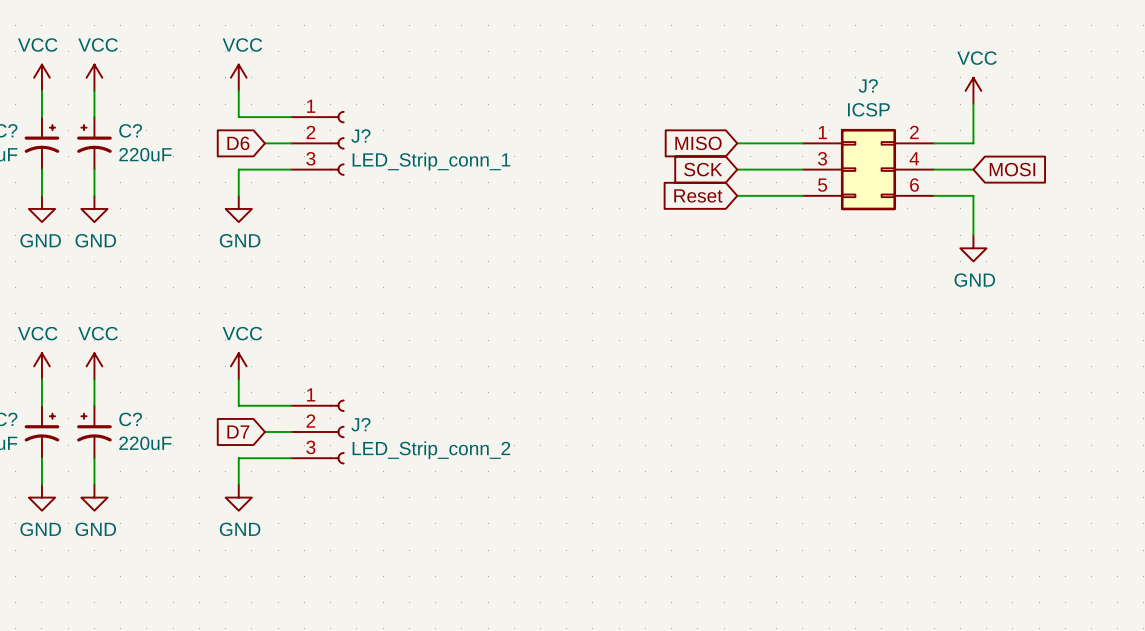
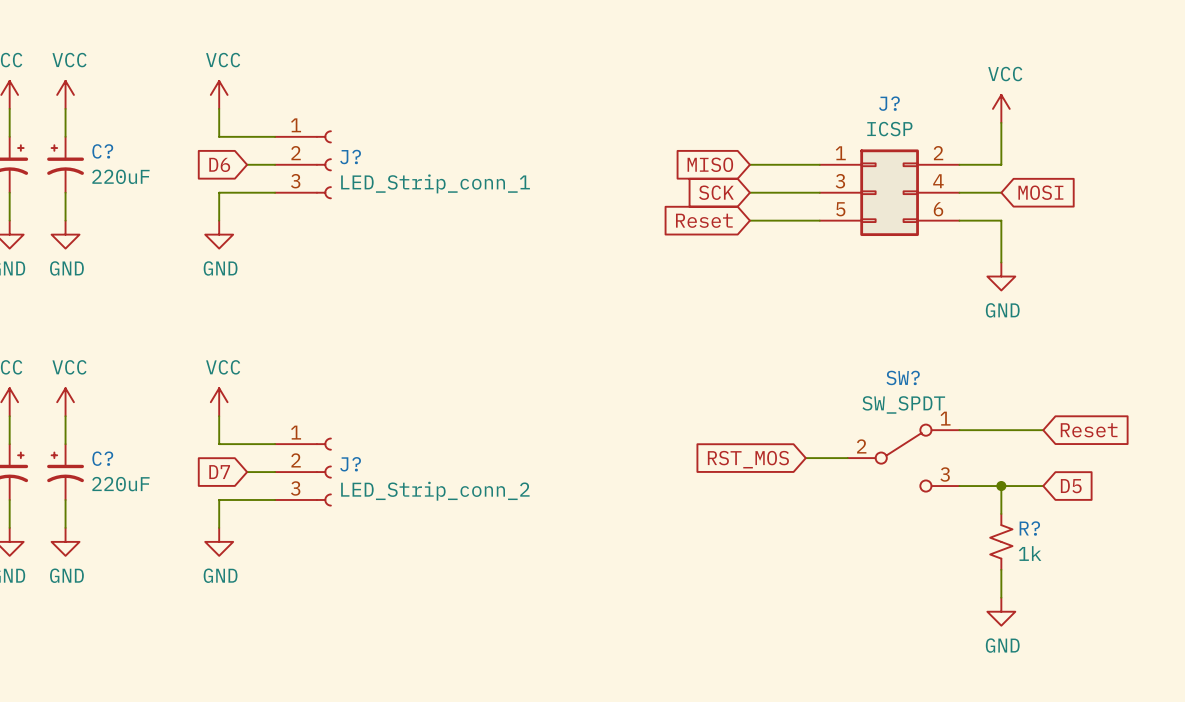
wire: none -> (959, 430) (1043, 430)
global label: none -> Reset (1089, 430)
wire: none -> (805, 458) (847, 458)
SW?: none -> SW_SPDT (903, 458)
global label: none -> RST_MOS (748, 459)
wire: none -> (959, 486) (1043, 486)
wire: none -> (1001, 486) (1001, 513)
junction: none -> (1001, 486)
global label: none -> D5 (1071, 486)
R?: none -> 1k (1001, 541)
wire: none -> (1001, 569) (1001, 597)
power symbol: none -> GND (1001, 611)

